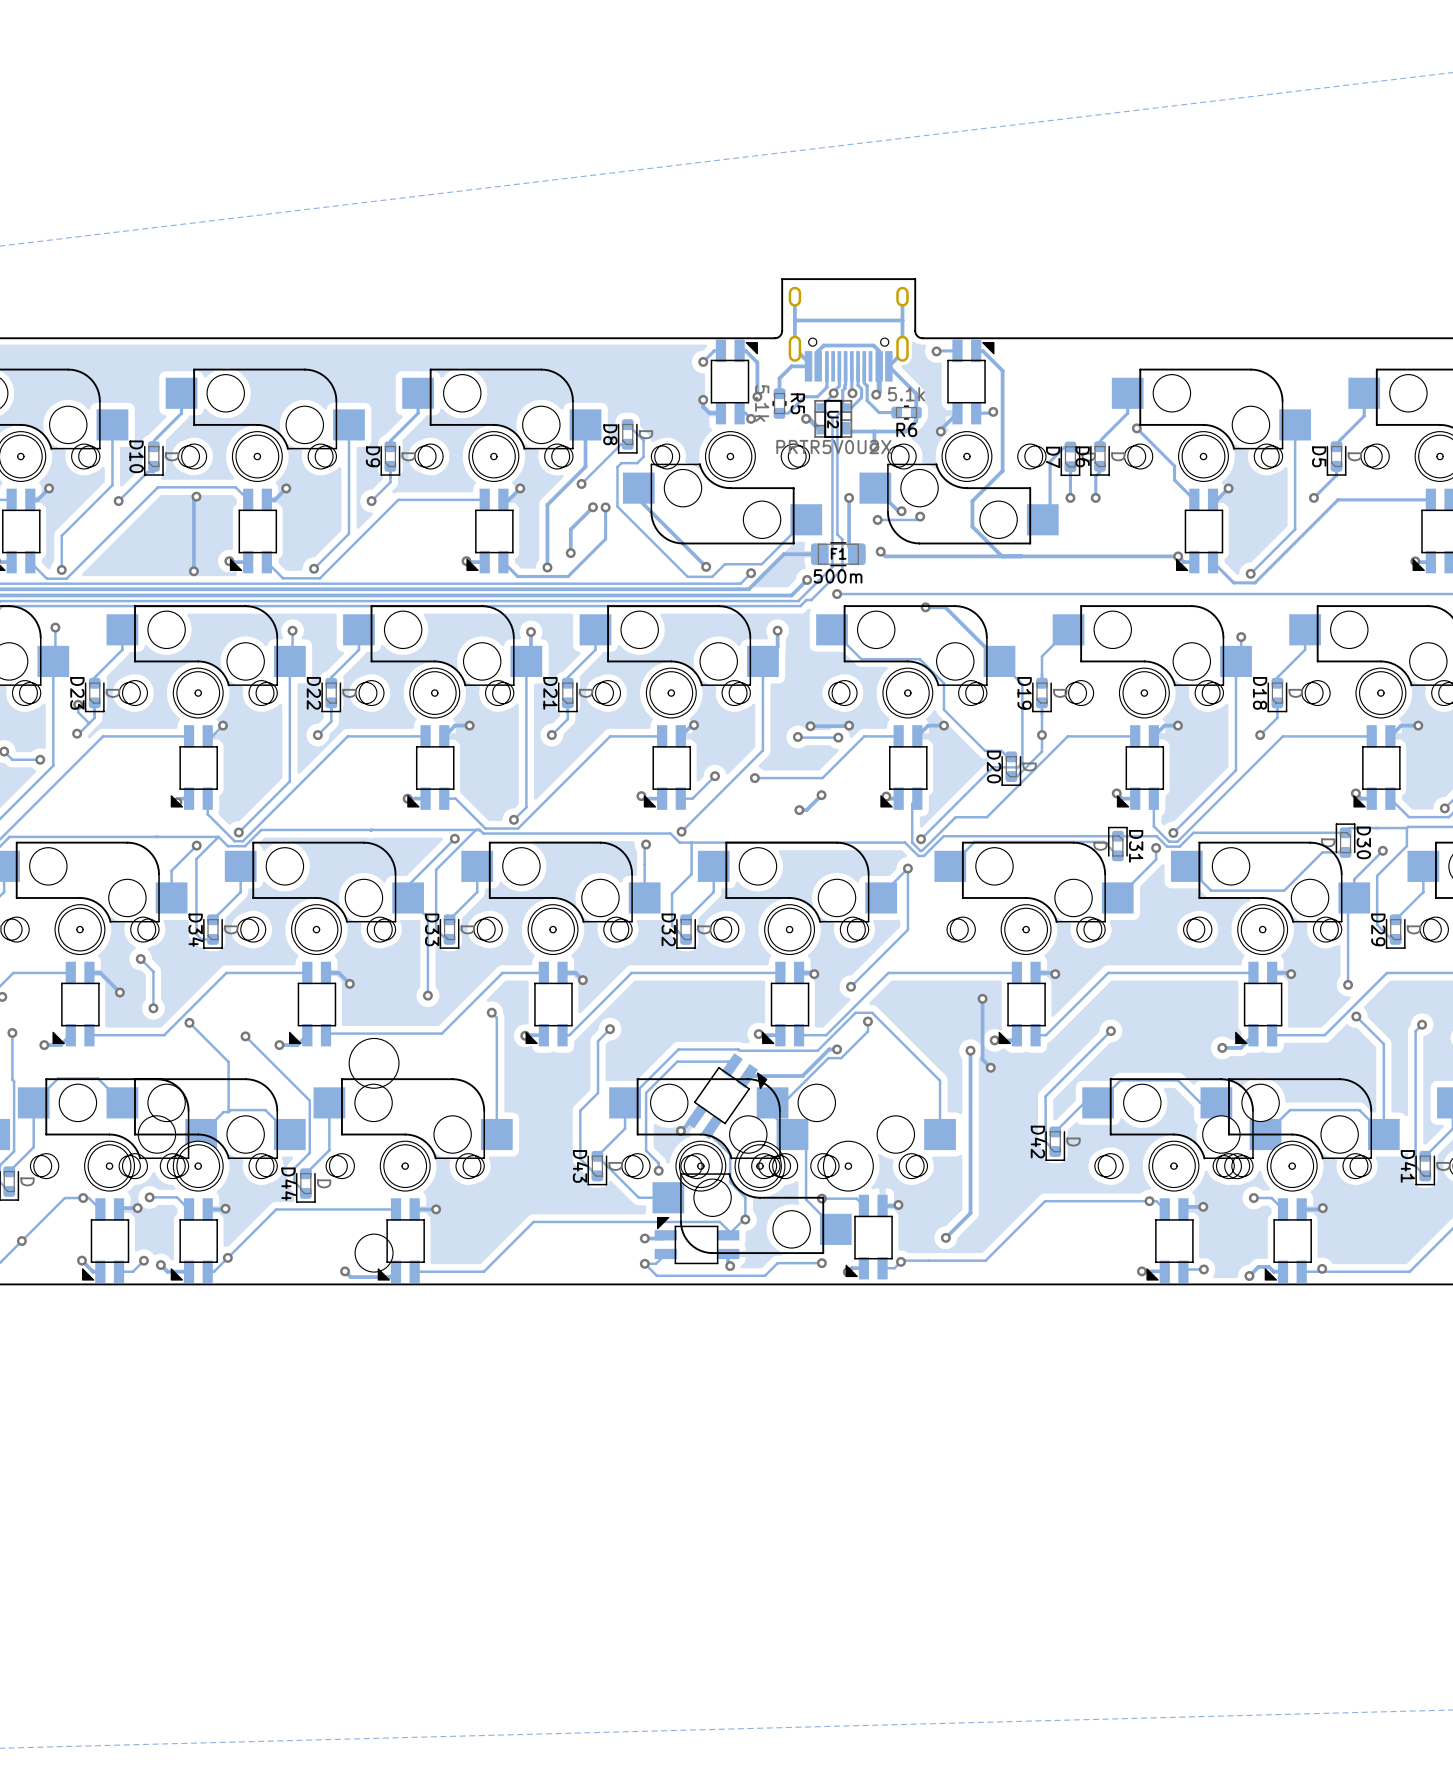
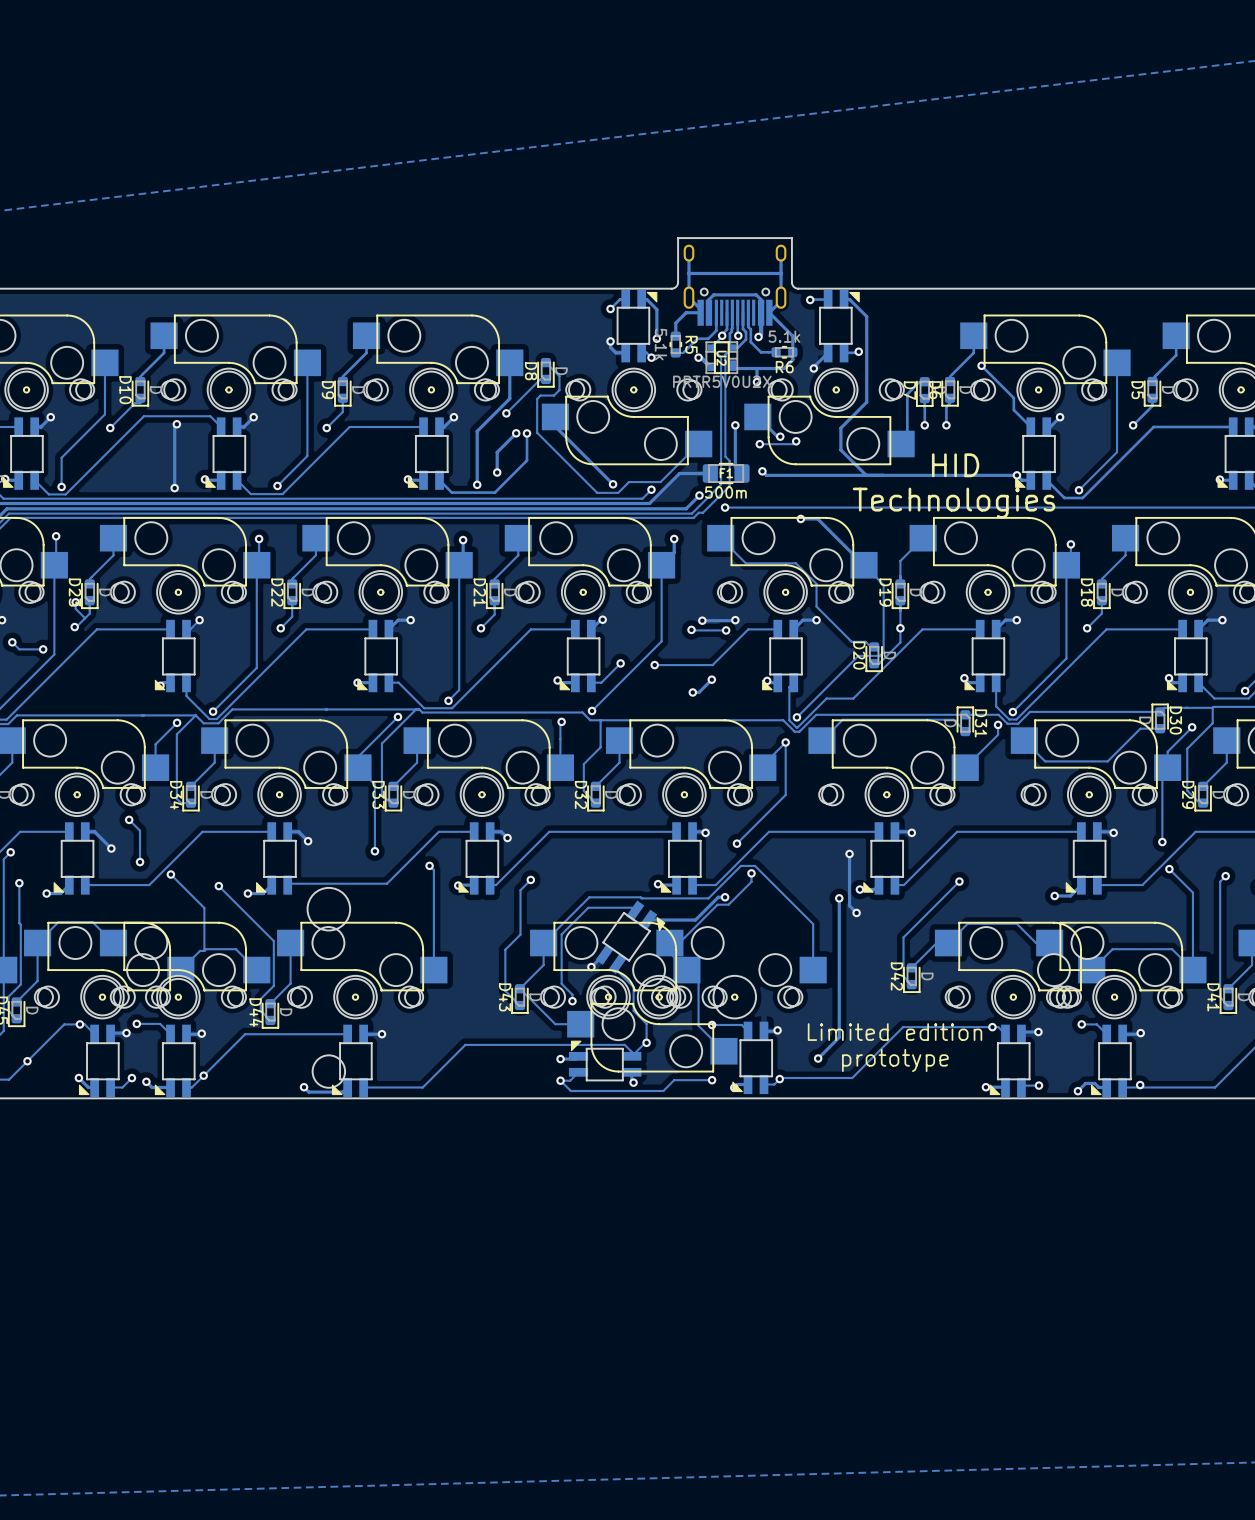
text: none -> HID (955, 465)
text: none -> Technologies (954, 503)
text: none -> Limited edition (895, 1032)
text: none -> prototype (895, 1060)

